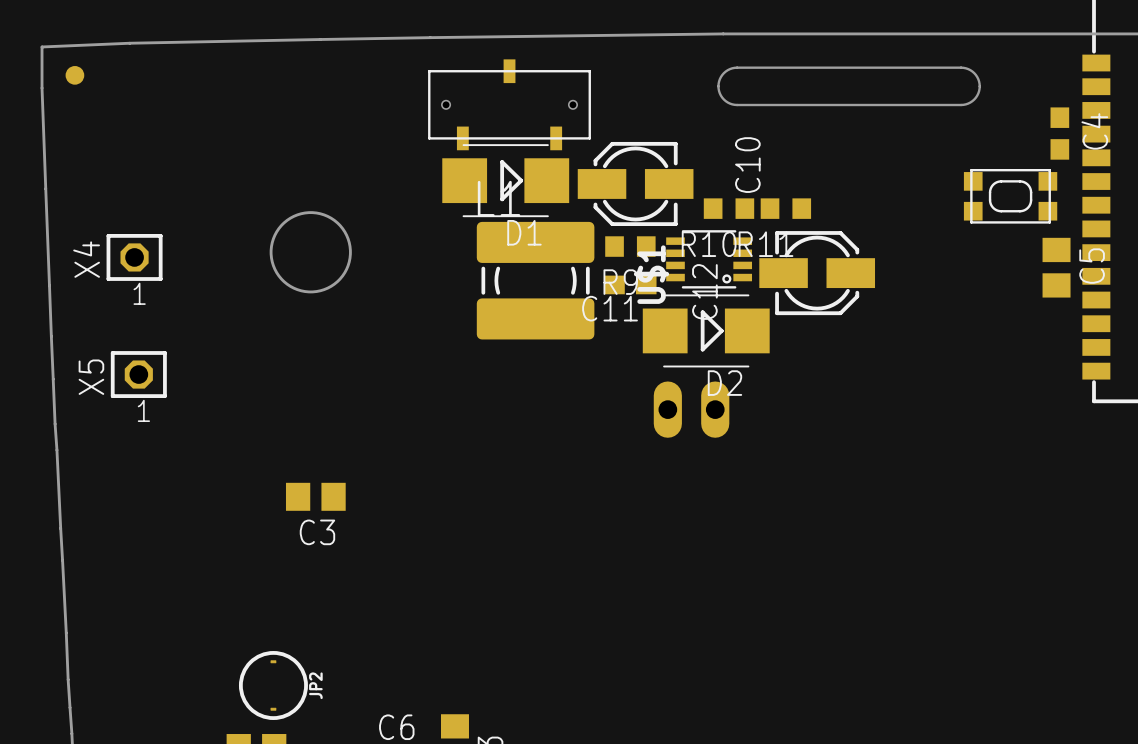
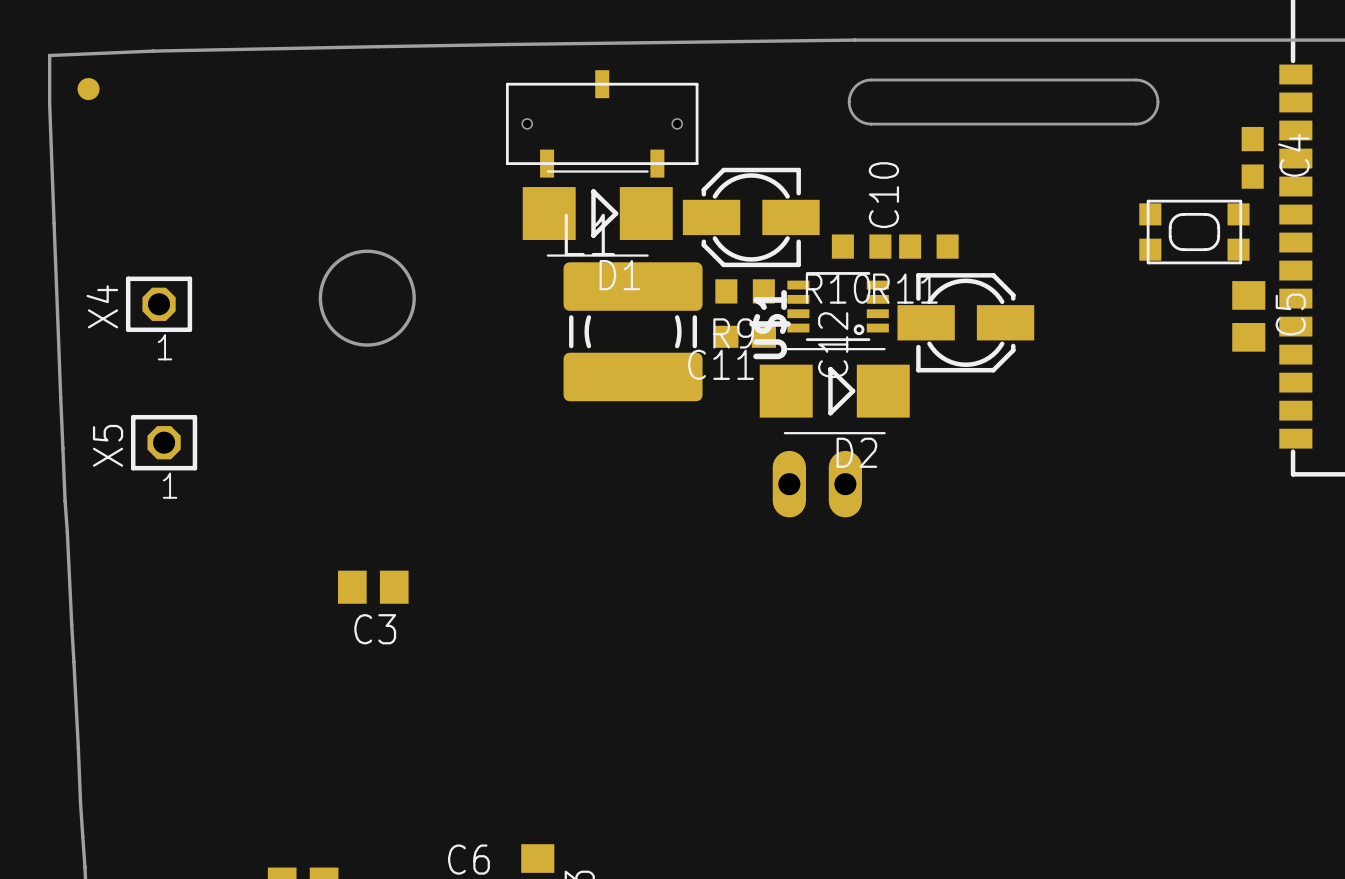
JP2: (273, 685) -> none

